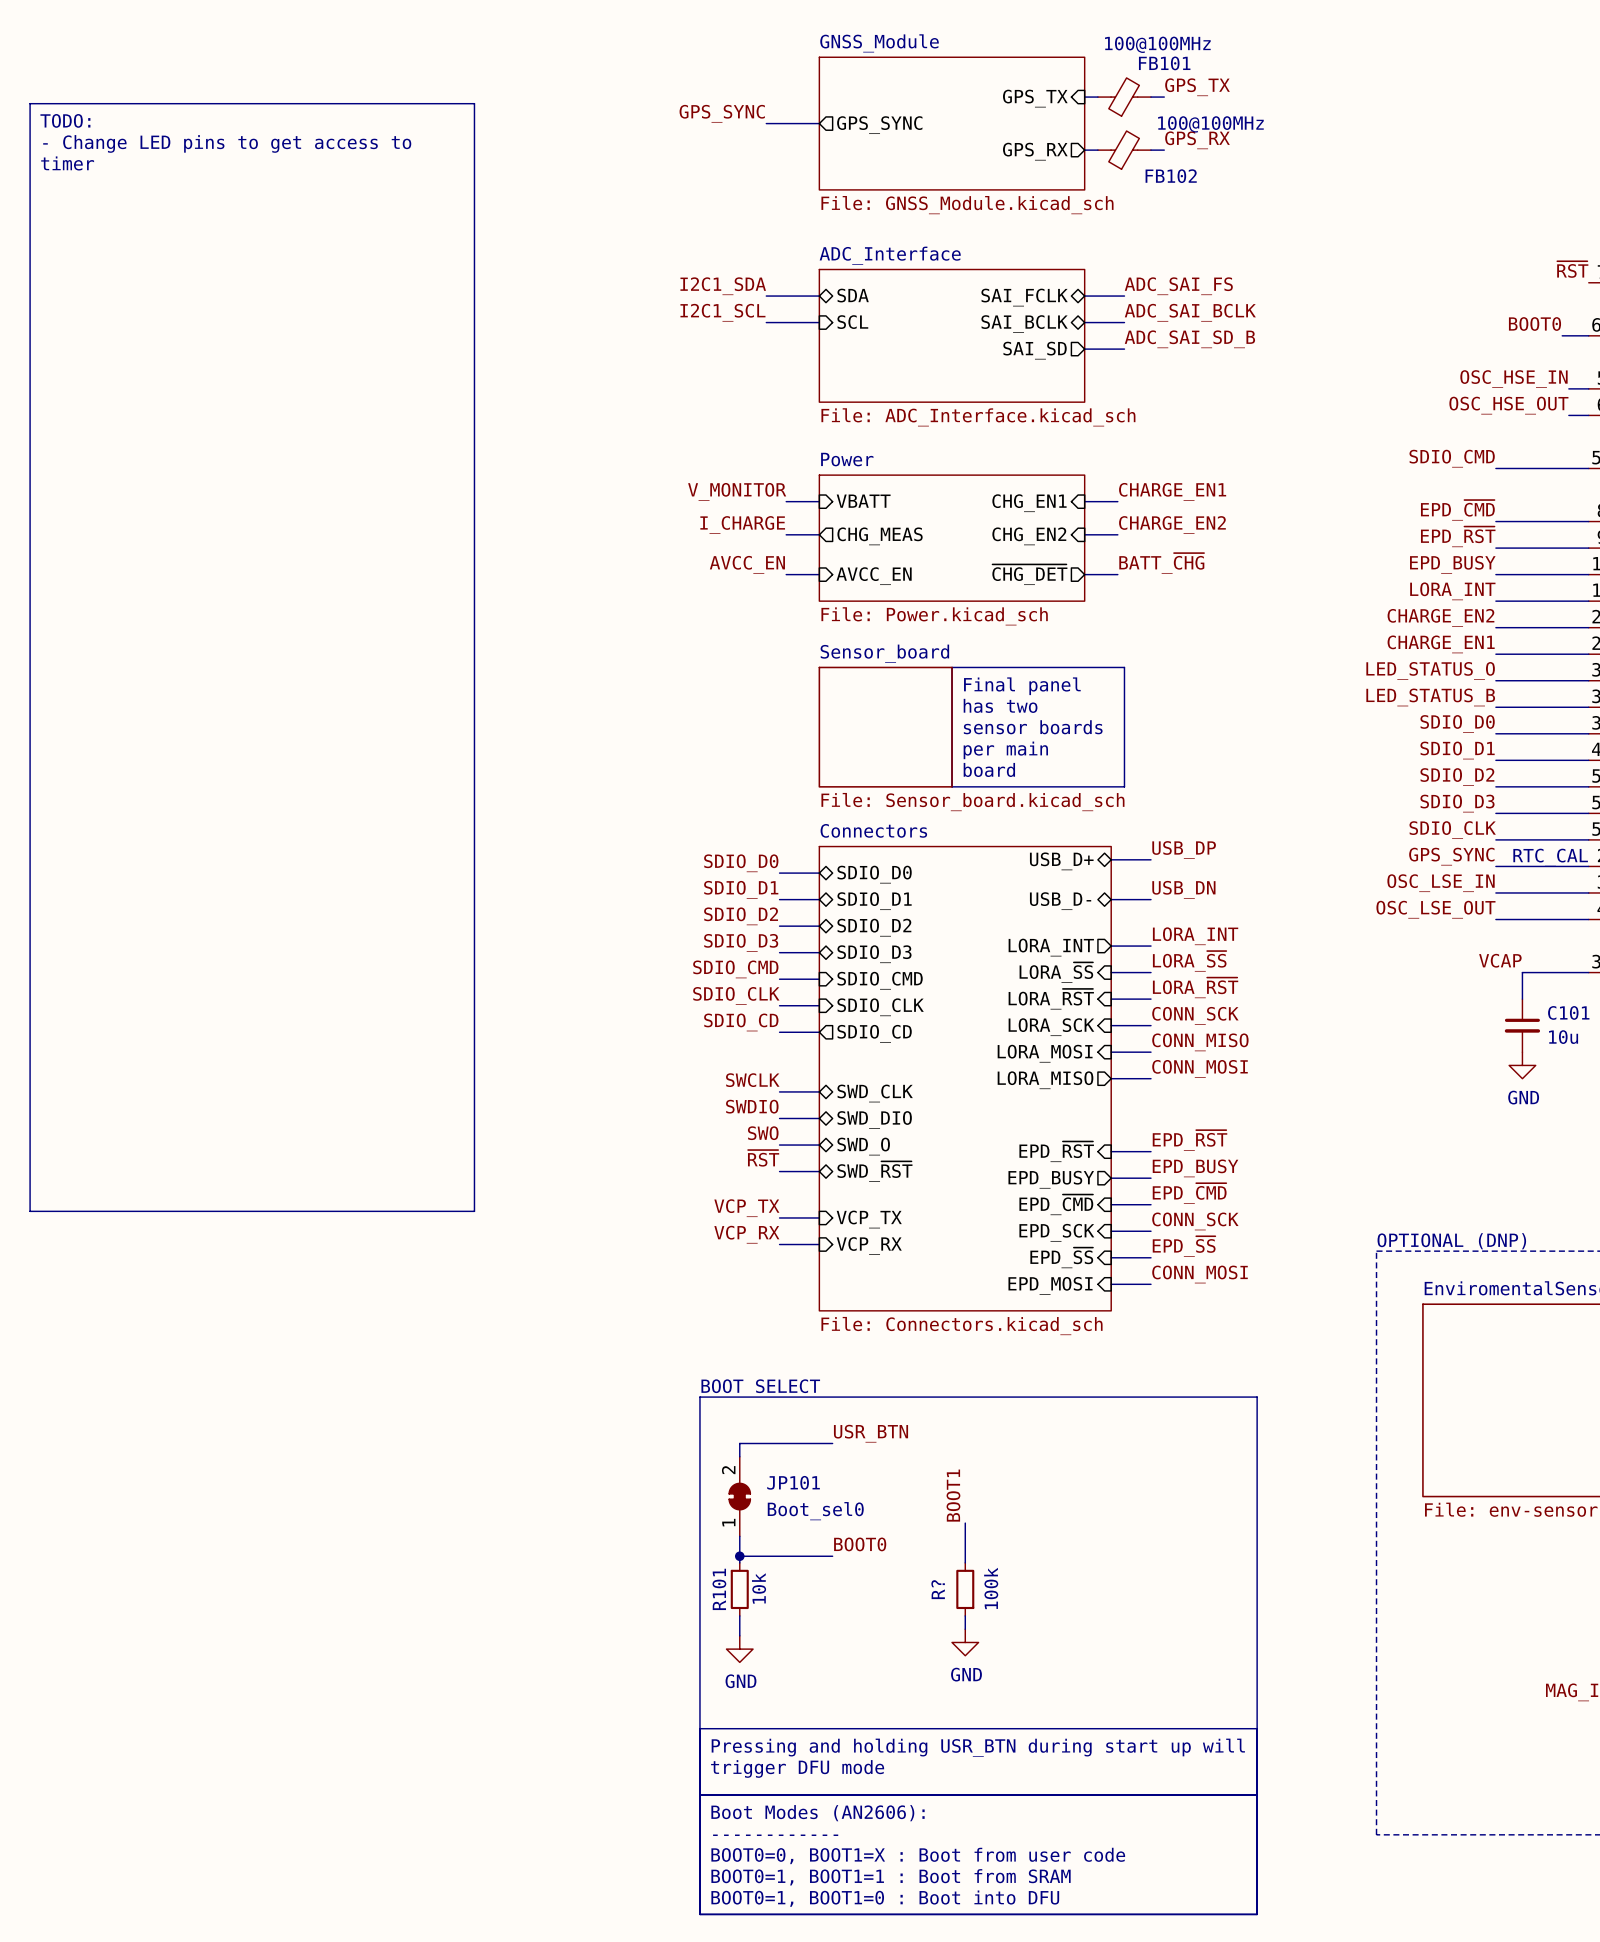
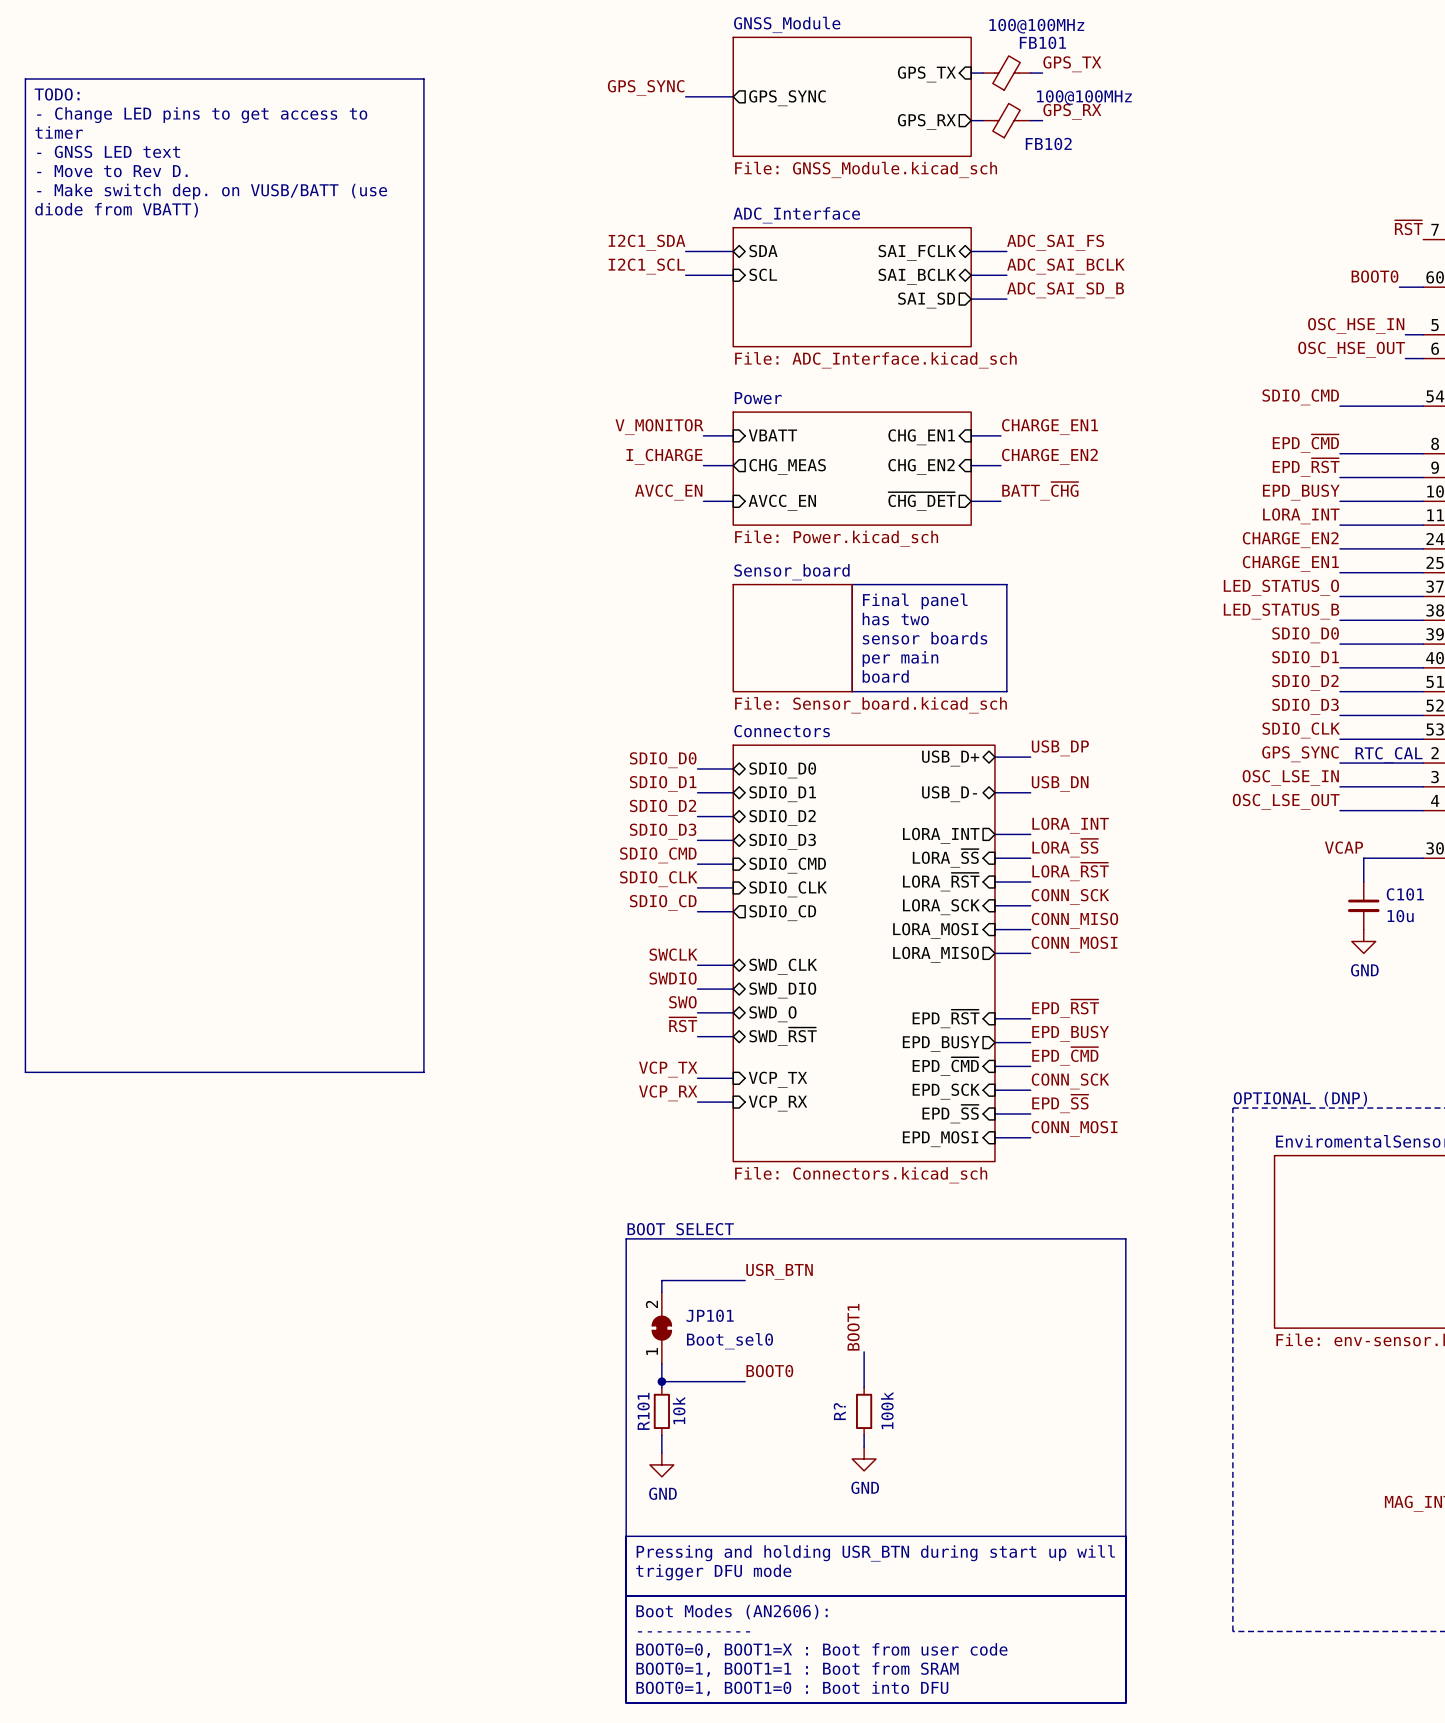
text: none -> - GNSS LED text (108, 151)
text: none -> - Move to Rev D. (112, 171)
text: none -> - Make switch dep. on VUSB/BATT (use (212, 191)
text: none -> diode from VBATT) (116, 210)

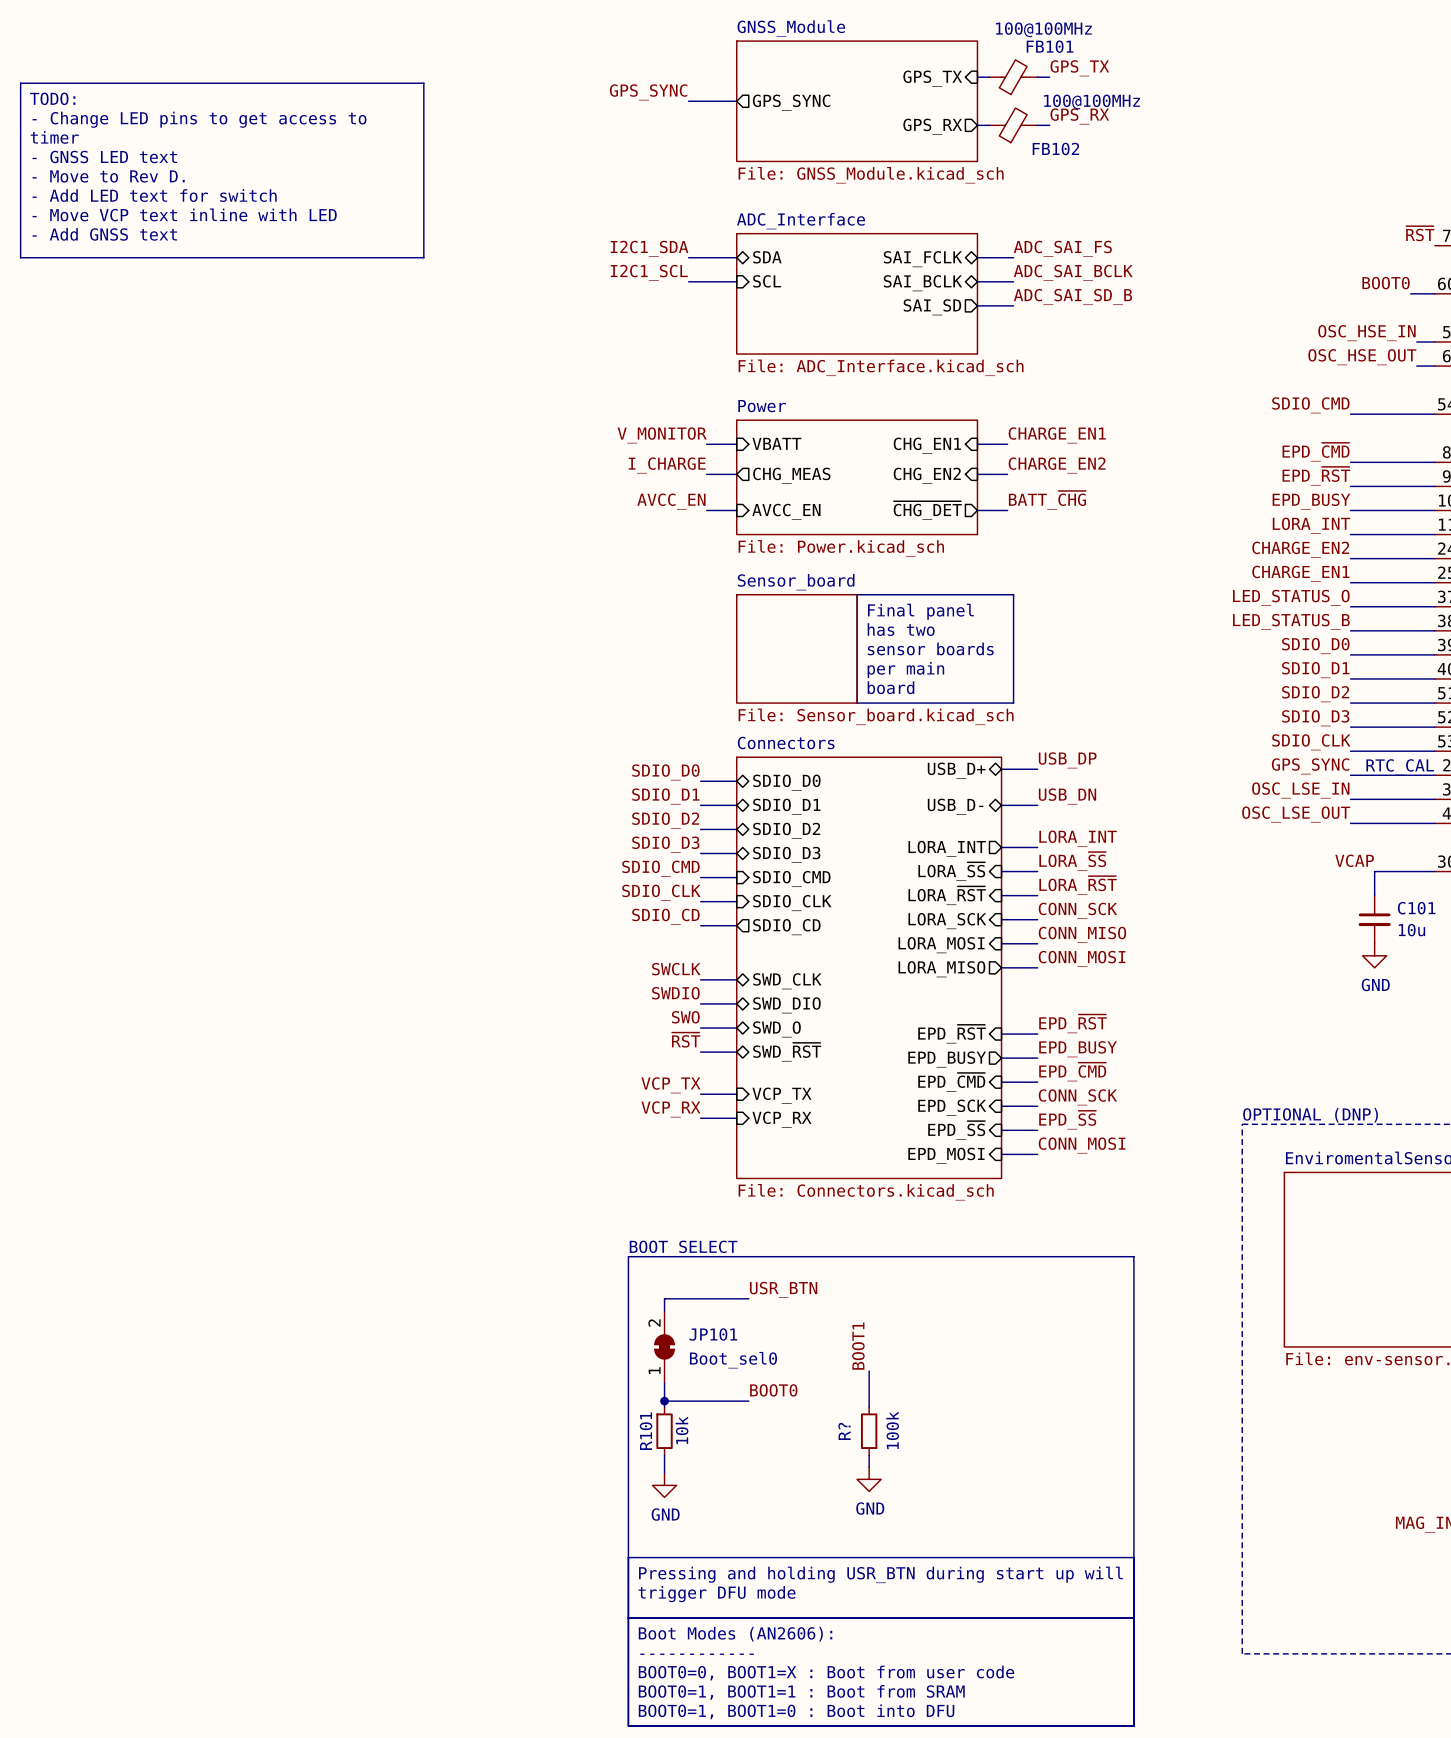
text: - Make switch dep. on VUSB/BATT (use (212, 191) -> - Add LED text for switch (154, 195)
text: diode from VBATT) (116, 210) -> - Move VCP text inline with LED (184, 214)
text: none -> - Add GNSS text (104, 234)
line: (25, 251) (25, 1072) (423, 1072) (423, 251) -> (20, 257) (423, 257)

